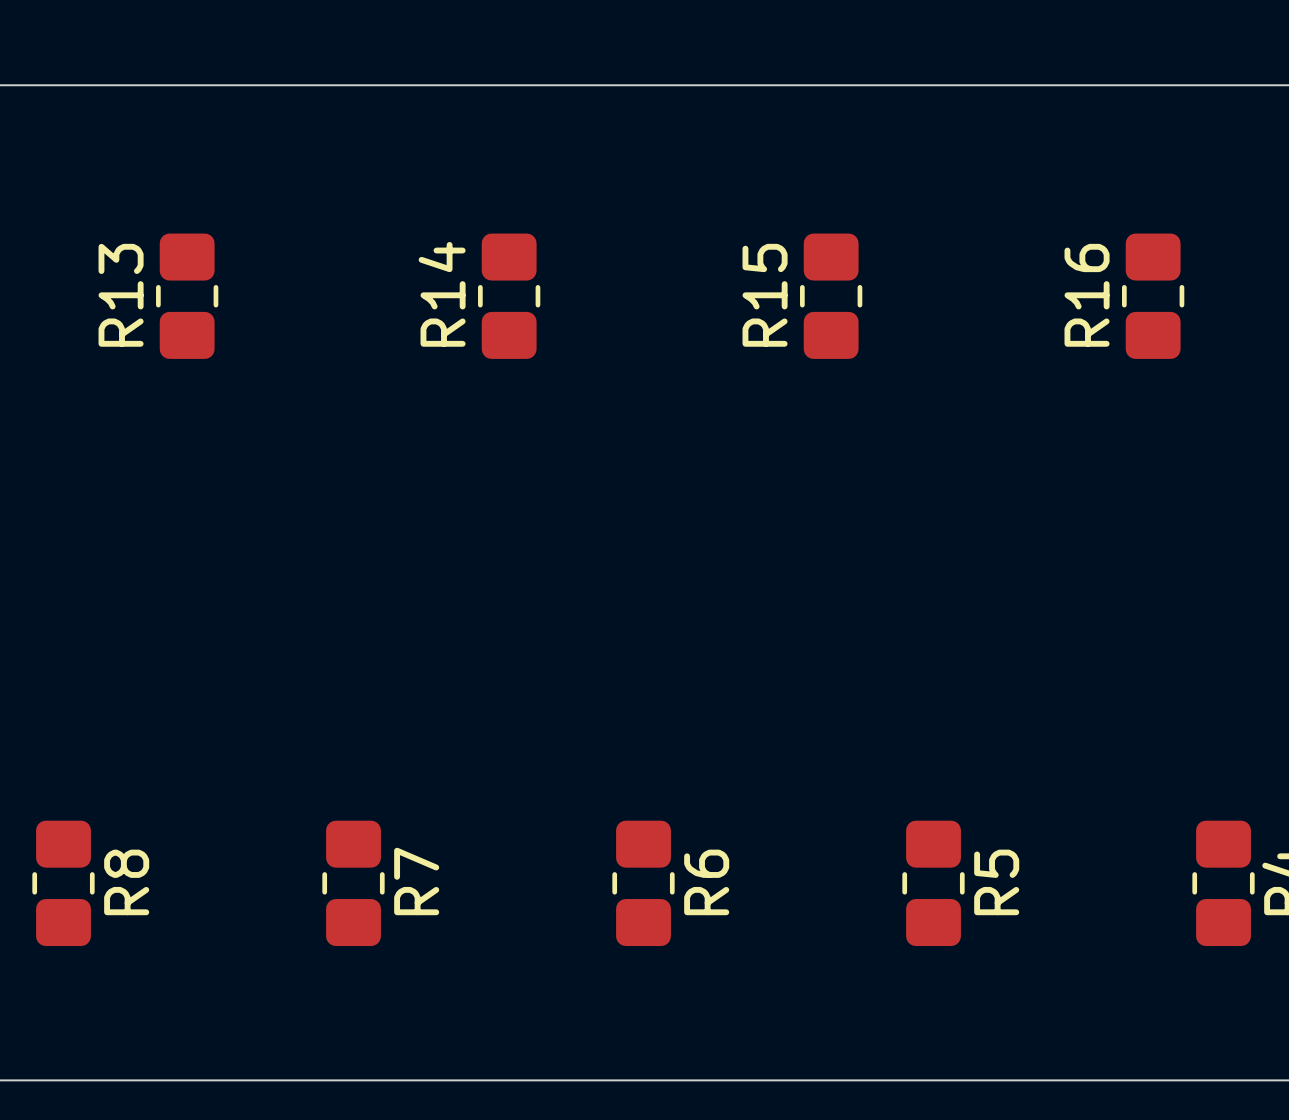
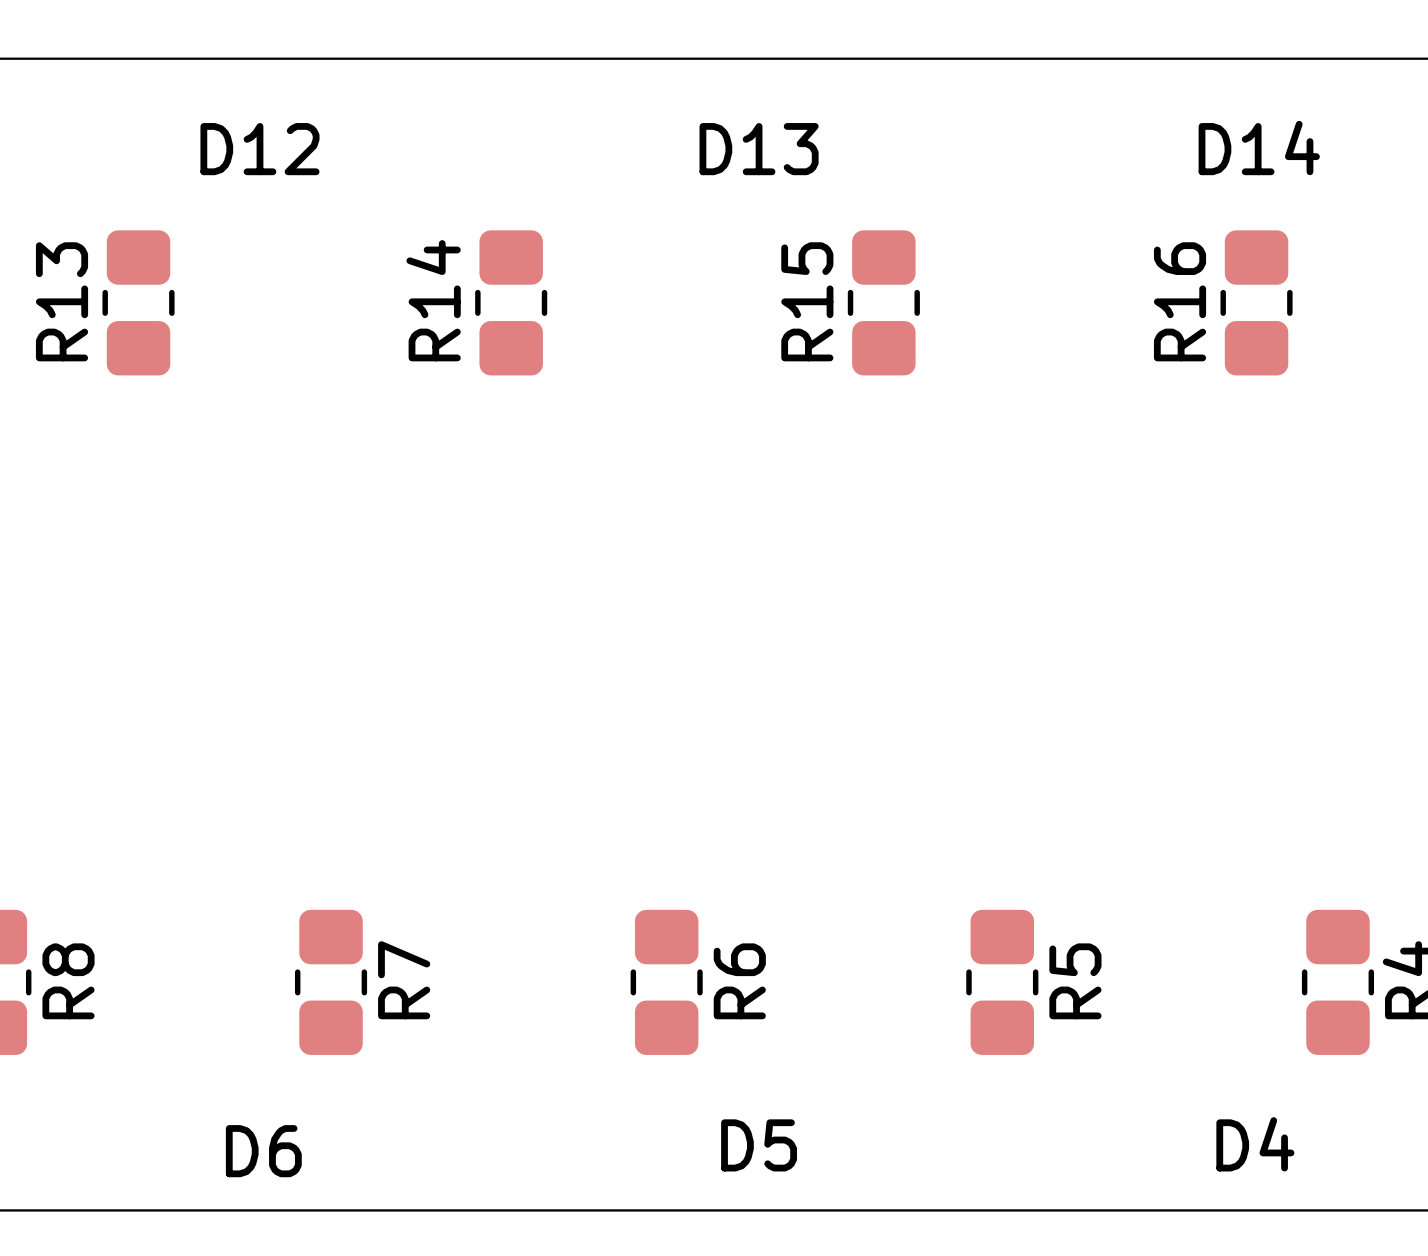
D14: none -> (1259, 148)
D12: none -> (259, 149)
D13: none -> (759, 149)
D4: none -> (1255, 1144)
D5: none -> (759, 1145)
D6: none -> (263, 1151)

